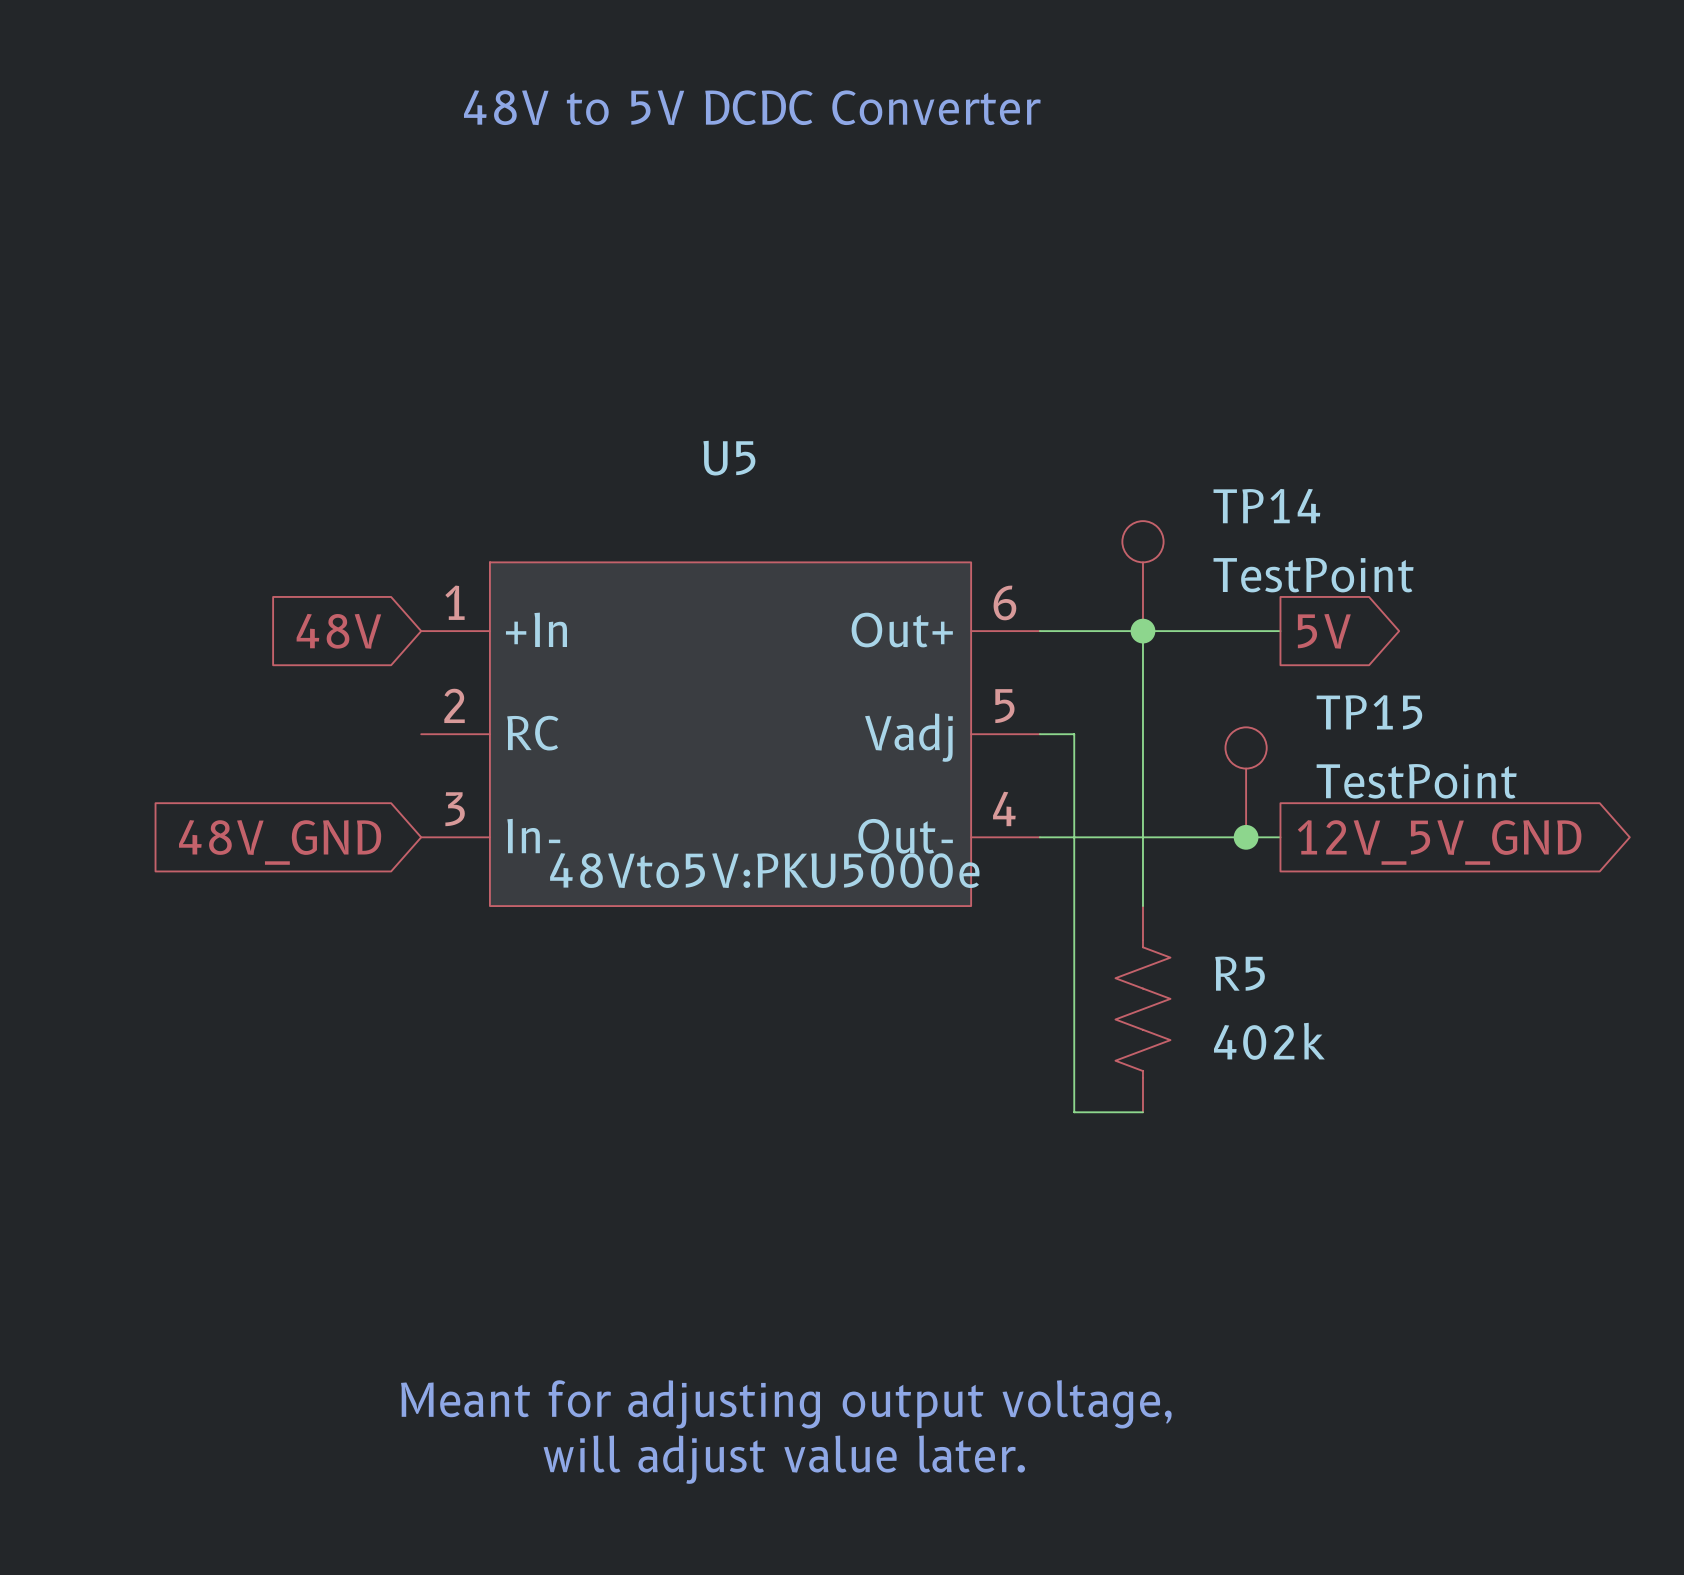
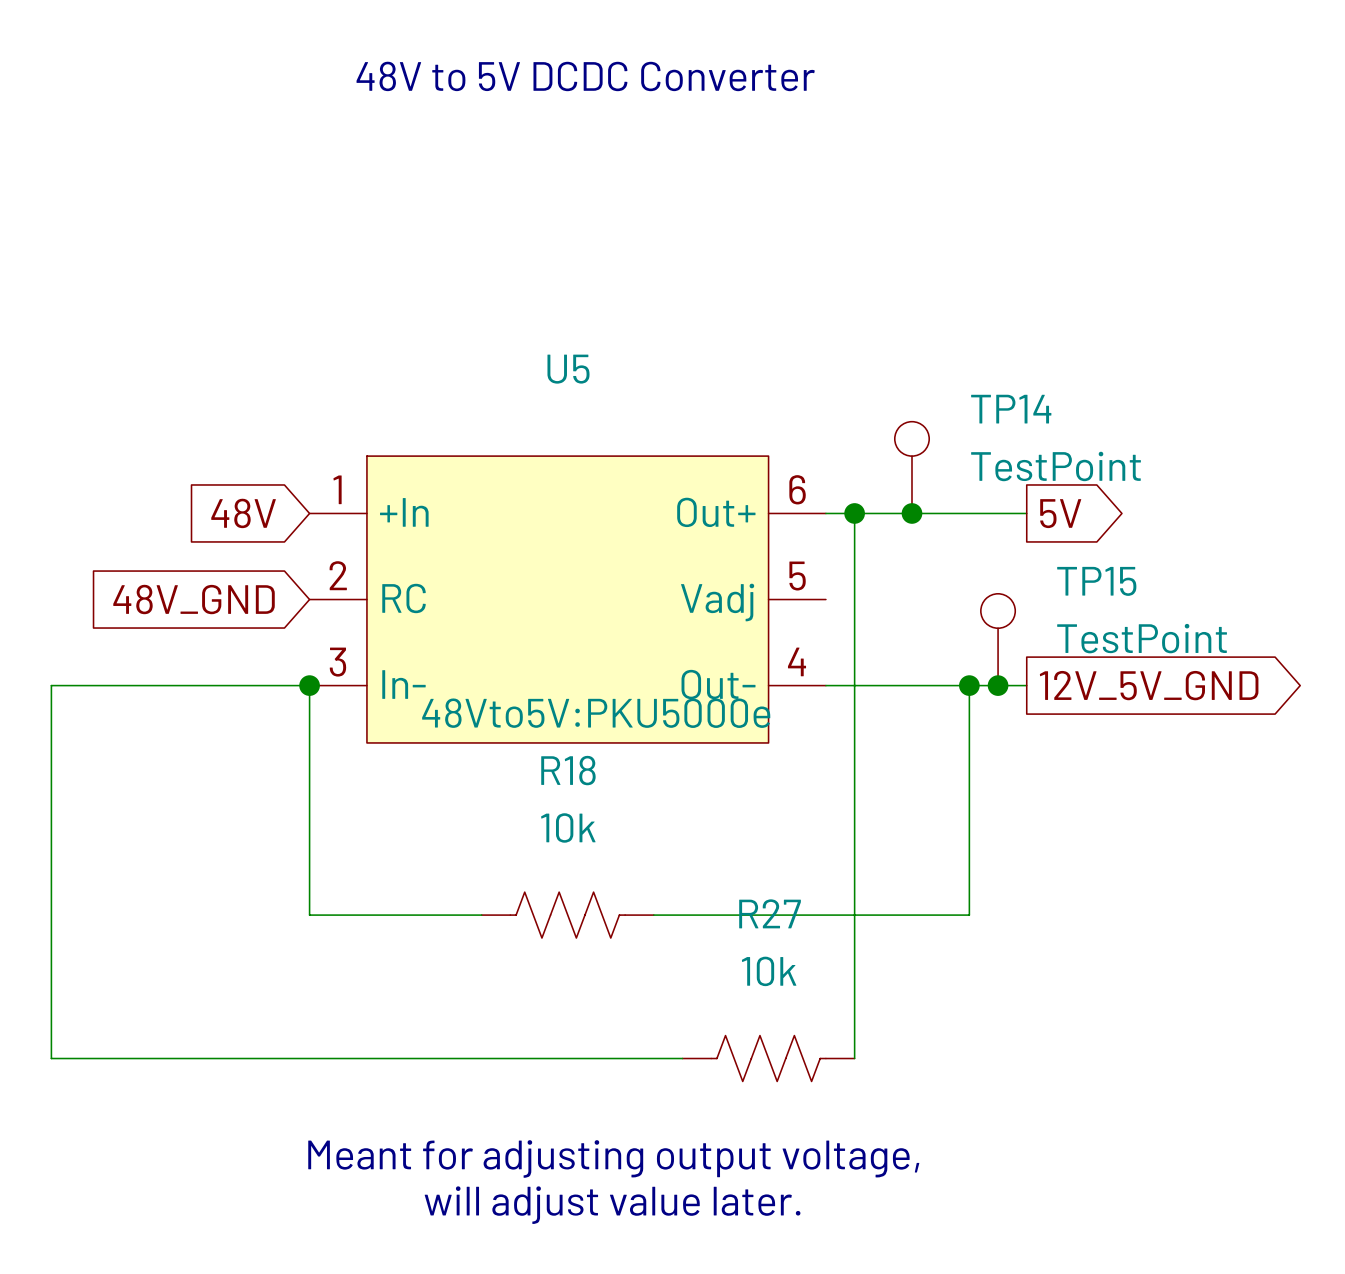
junction: none -> (854, 513)
wire: (1142, 631) (1142, 906) -> none
wire: (1039, 734) (1074, 734) -> (854, 513) (854, 599)
junction: none -> (309, 685)
wire: none -> (969, 685) (969, 915) (911, 915)
junction: none -> (969, 685)
global label position: 48V_GND (280, 842) -> 48V_GND (194, 599)
R5: 402k (1142, 1009) -> none
wire: none -> (481, 915) (309, 915) (309, 685) (51, 685) (51, 1058) (682, 1058)
R18: none -> 10k (567, 915)
wire: none -> (653, 915) (854, 915) (854, 1058)
R27: none -> 10k (768, 1058)

